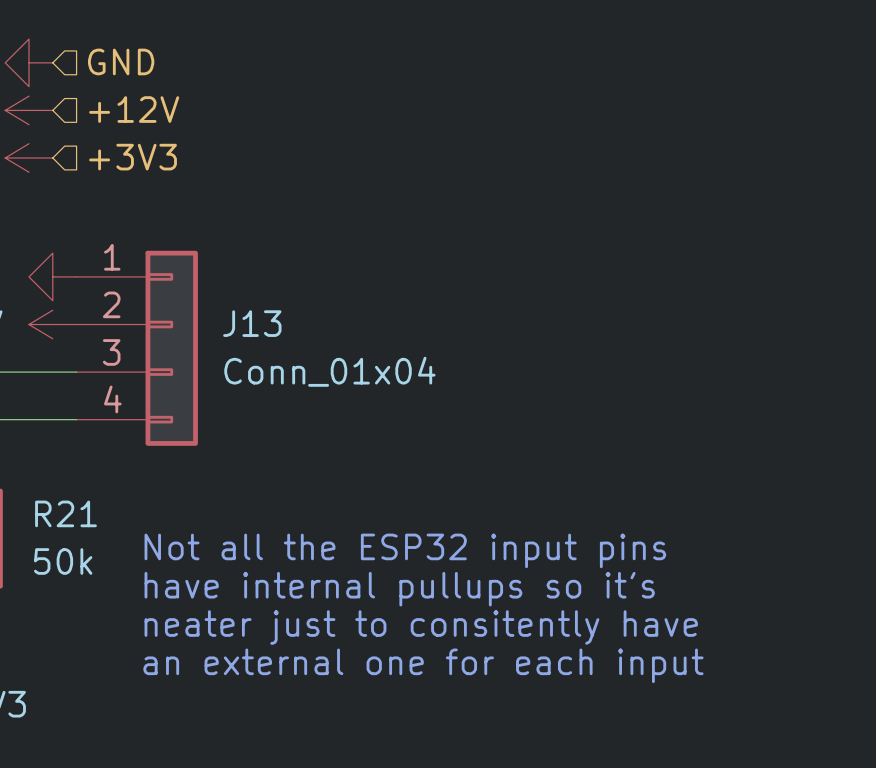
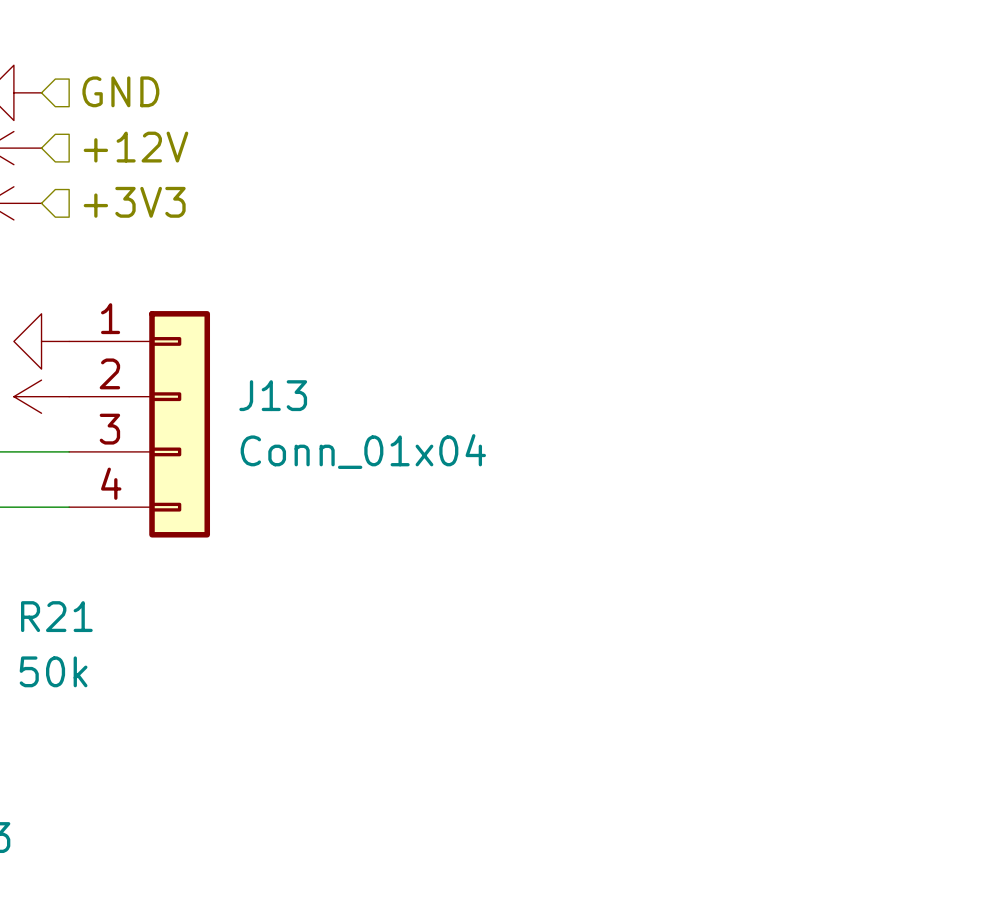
text: Not all the ESP32 input pins (405, 550) -> none
text: have internal pullups so it's (399, 589) -> none
text: neater just to consitently have (421, 627) -> none
text: an external one for each input (423, 665) -> none

